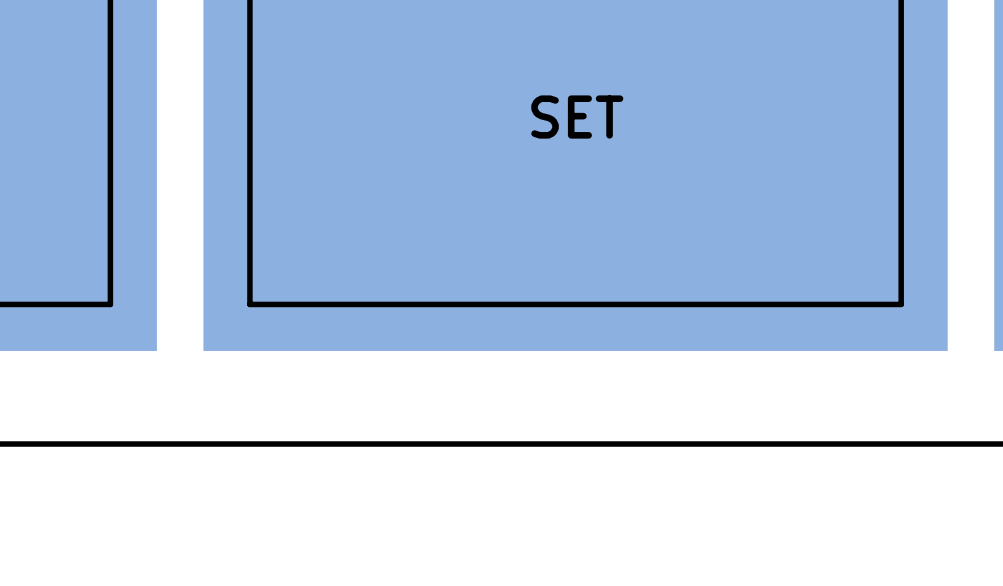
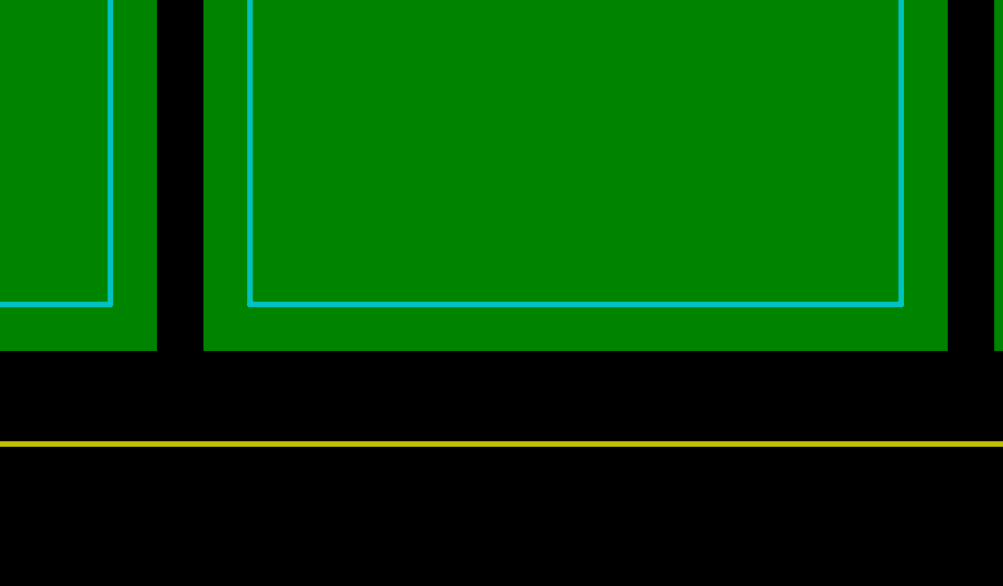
part value: SET (577, 117) -> none

